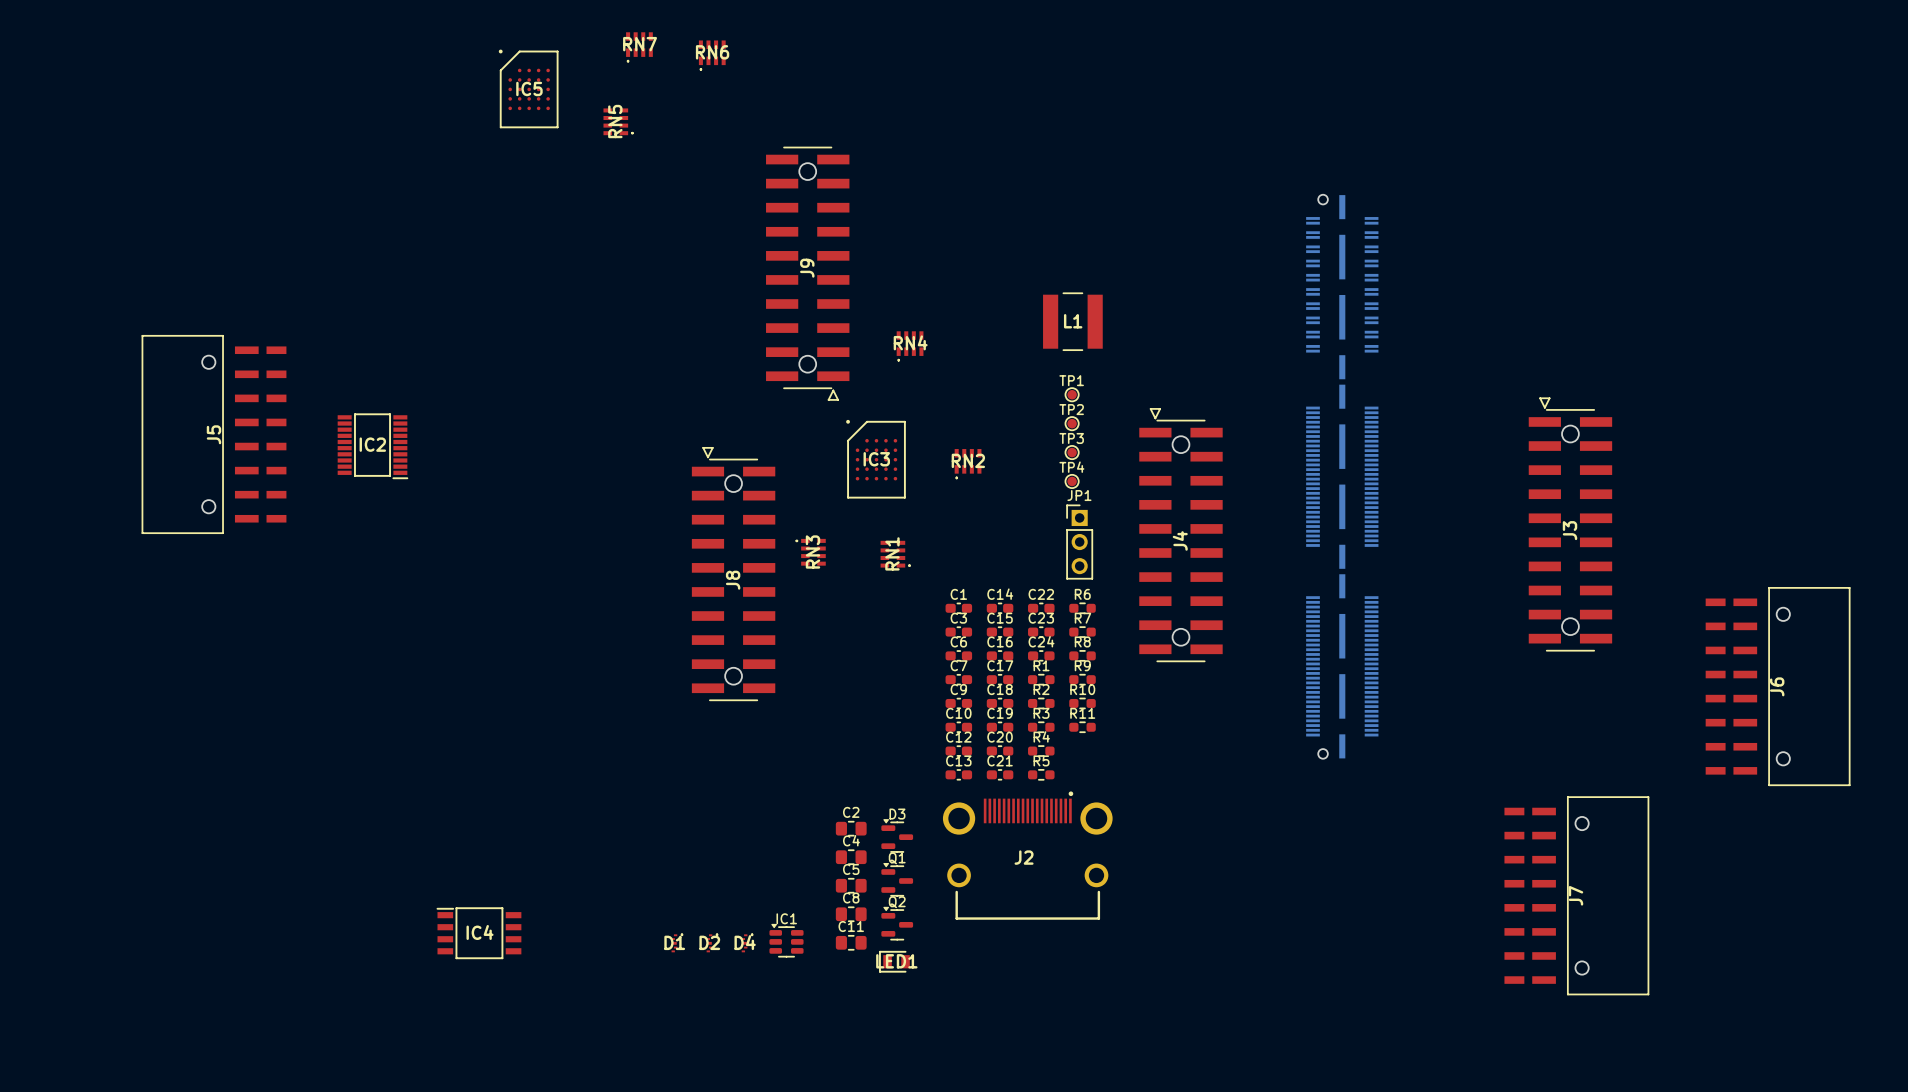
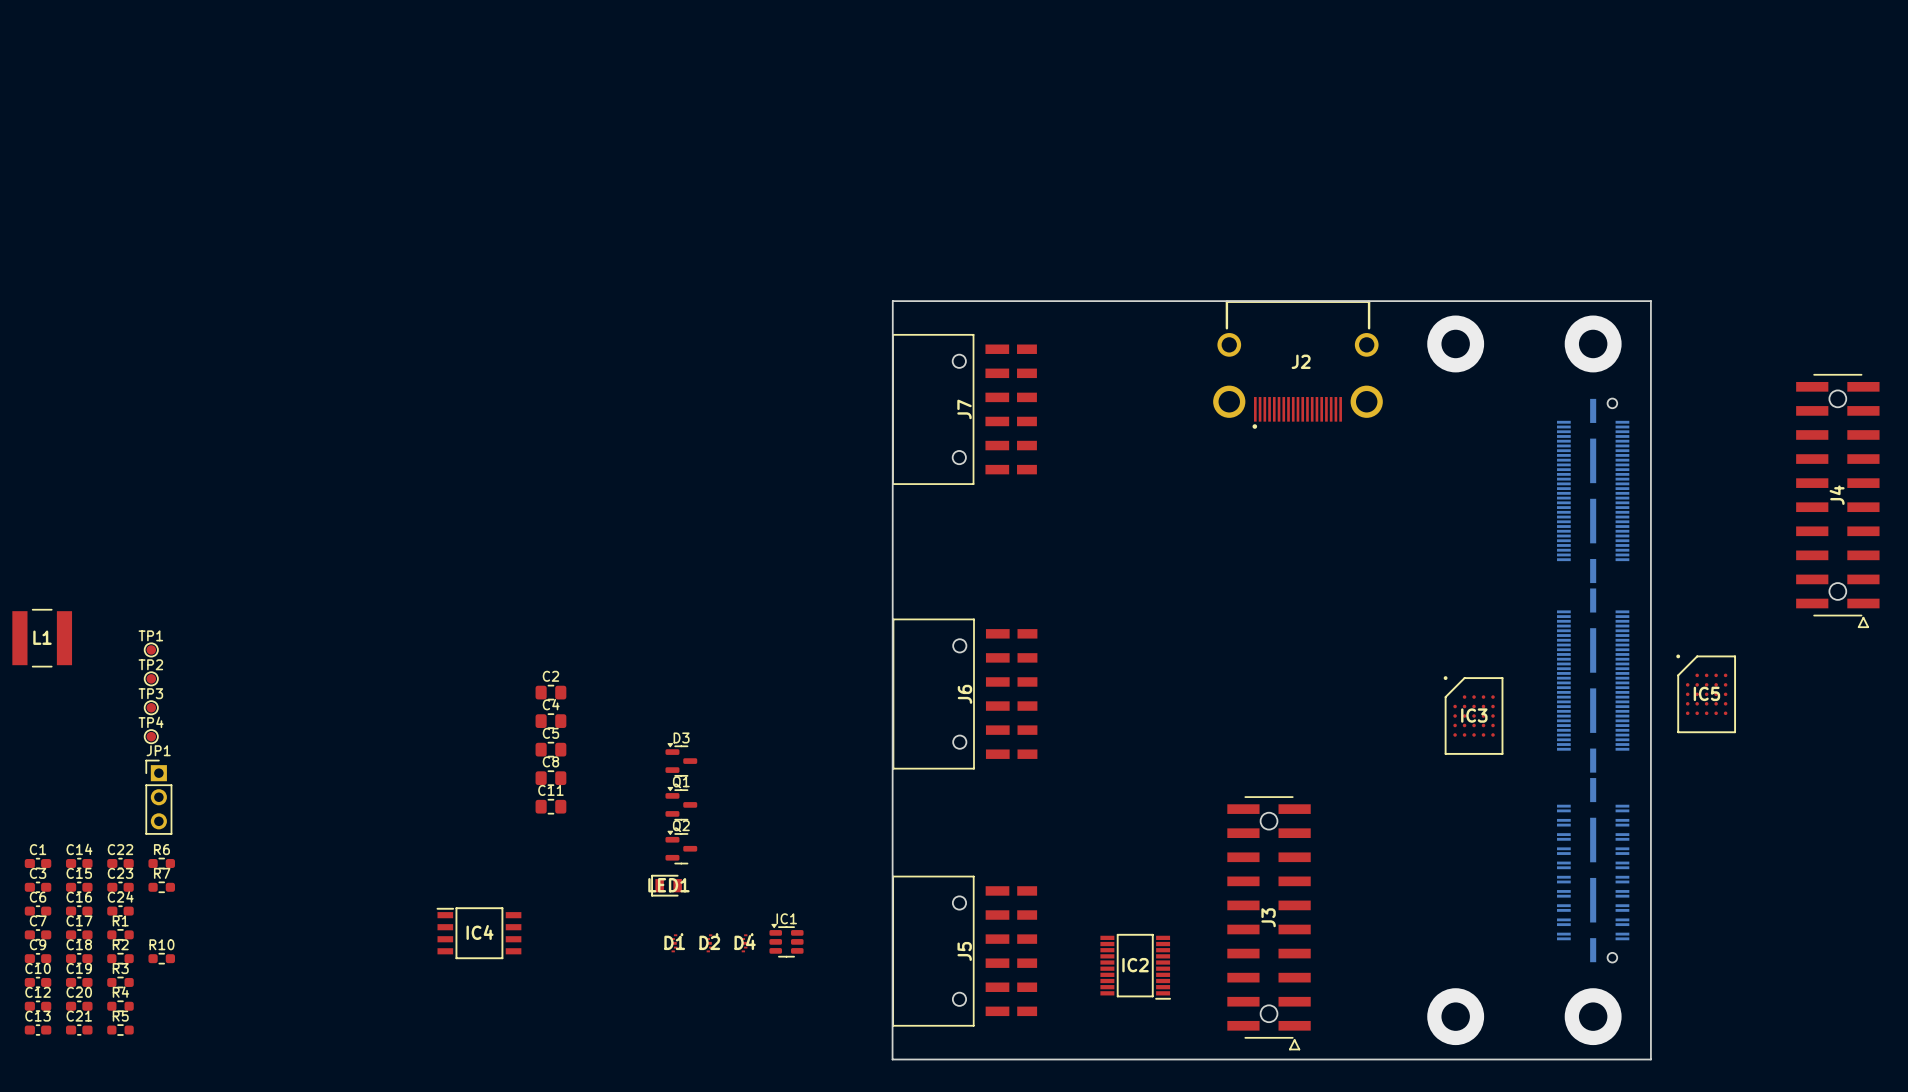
RN7: (639, 47) -> none
RN6: (712, 55) -> none
IC5 position: (528, 88) -> (1706, 693)
RN5: (618, 121) -> none
J9: (807, 273) -> none
board edge: none -> (892, 301) (1650, 301) (1650, 1059) (892, 1059) (892, 301)
L1 position: (1072, 321) -> (42, 638)
J5 footprint: [141, 335, 287, 534] -> [892, 876, 1038, 1027]
via: none -> (1455, 343)
via: none -> (1593, 343)
RN4: (910, 346) -> none
TP1 position: (1072, 394) -> (151, 649)
TP2 position: (1072, 423) -> (151, 678)
IC2 position: (372, 446) -> (1135, 966)
TP3 position: (1072, 452) -> (151, 707)
IC3 position: (876, 459) -> (1473, 715)
RN2: (968, 463) -> none
part: (1342, 476) -> none
TP4 position: (1072, 481) -> (151, 736)
J3 rotation: 0° (1570, 524) -> 180° (1269, 923)
J3 position: (1570, 524) -> (1269, 923)
J4 rotation: 0° (1180, 535) -> 180° (1837, 500)
J4 position: (1180, 535) -> (1837, 500)
JP1 position: (1079, 542) -> (158, 797)
RN3: (810, 552) -> none
RN1: (895, 554) -> none
J8: (733, 574) -> none
J6 footprint: [1705, 587, 1851, 786] -> [892, 618, 1038, 770]
C1 position: (958, 608) -> (38, 863)
C14 position: (1000, 608) -> (79, 863)
C22 position: (1041, 608) -> (120, 863)
R6 position: (1082, 608) -> (161, 863)
C3 position: (958, 632) -> (38, 887)
C15 position: (1000, 632) -> (79, 887)
C23 position: (1041, 632) -> (120, 887)
R7 position: (1082, 632) -> (161, 887)
C6 position: (958, 655) -> (38, 911)
C16 position: (1000, 655) -> (79, 911)
C24 position: (1041, 655) -> (120, 911)
R8: (1082, 655) -> none
C7 position: (958, 679) -> (38, 934)
C17 position: (1000, 679) -> (79, 934)
R1 position: (1041, 679) -> (120, 934)
R9: (1082, 679) -> none
part: none -> (1593, 680)
C9 position: (958, 703) -> (38, 958)
C18 position: (1000, 703) -> (79, 958)
R2 position: (1041, 703) -> (120, 958)
R10 position: (1082, 703) -> (161, 958)
C10 position: (958, 727) -> (38, 982)
C19 position: (1000, 727) -> (79, 982)
R3 position: (1041, 727) -> (120, 982)
R11: (1082, 727) -> none
C12 position: (958, 751) -> (38, 1006)
C20 position: (1000, 751) -> (79, 1006)
R4 position: (1041, 751) -> (120, 1006)
C13 position: (958, 774) -> (38, 1030)
C21 position: (1000, 774) -> (79, 1030)
R5 position: (1041, 774) -> (120, 1030)
J7 footprint: [1504, 796, 1649, 995] -> [892, 334, 1037, 485]
C2 position: (851, 828) -> (550, 692)
D3 position: (897, 835) -> (681, 759)
J2 rotation: 0° (1027, 855) -> 180° (1297, 364)
J2 position: (1027, 855) -> (1297, 364)
C4 position: (851, 857) -> (550, 721)
Q1 position: (897, 879) -> (681, 803)
C5 position: (851, 885) -> (550, 749)
C8 position: (851, 914) -> (550, 778)
Q2 position: (897, 923) -> (681, 847)
C11 position: (851, 942) -> (550, 806)
LED1 position: (894, 961) -> (666, 885)
via: none -> (1455, 1016)
via: none -> (1593, 1016)

